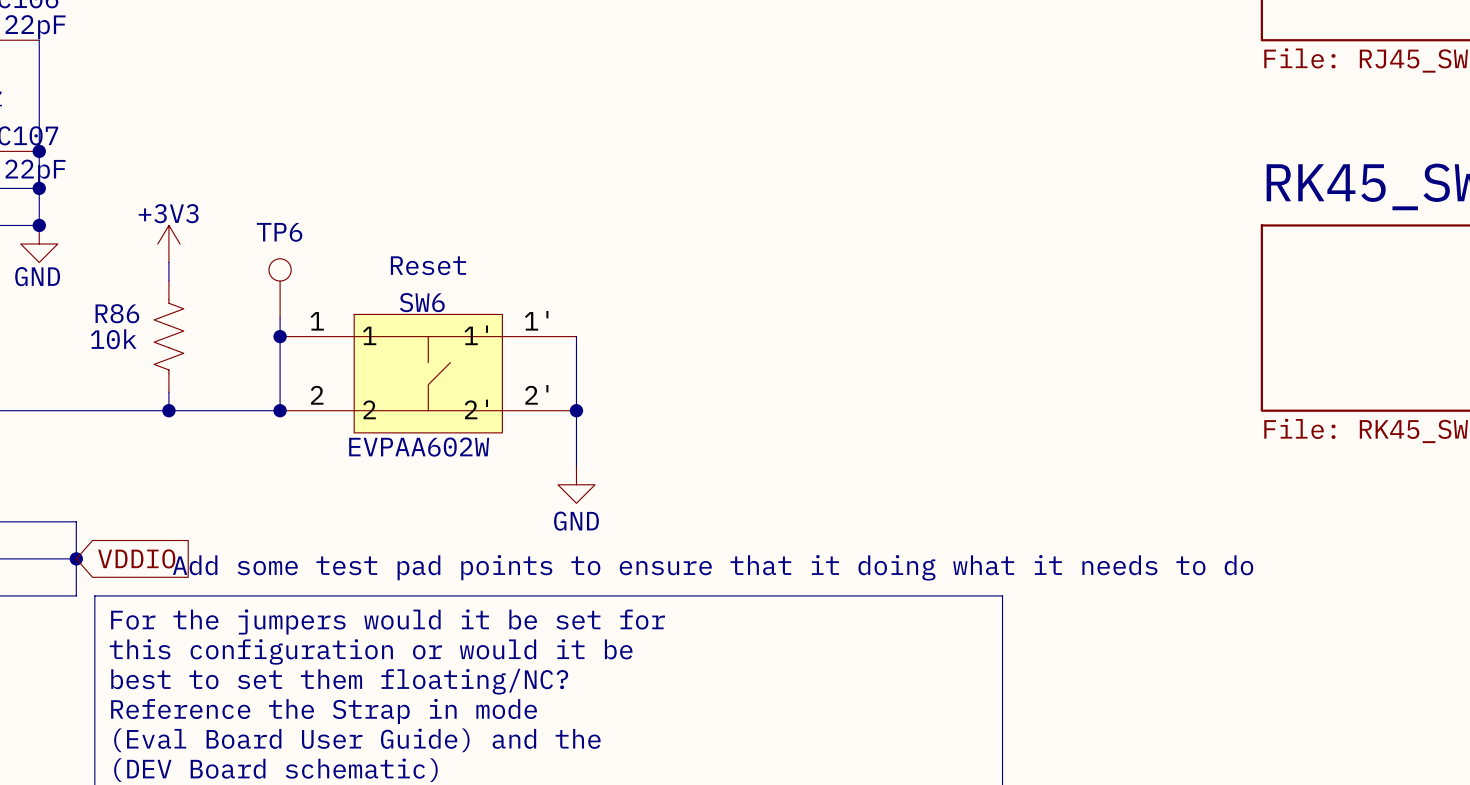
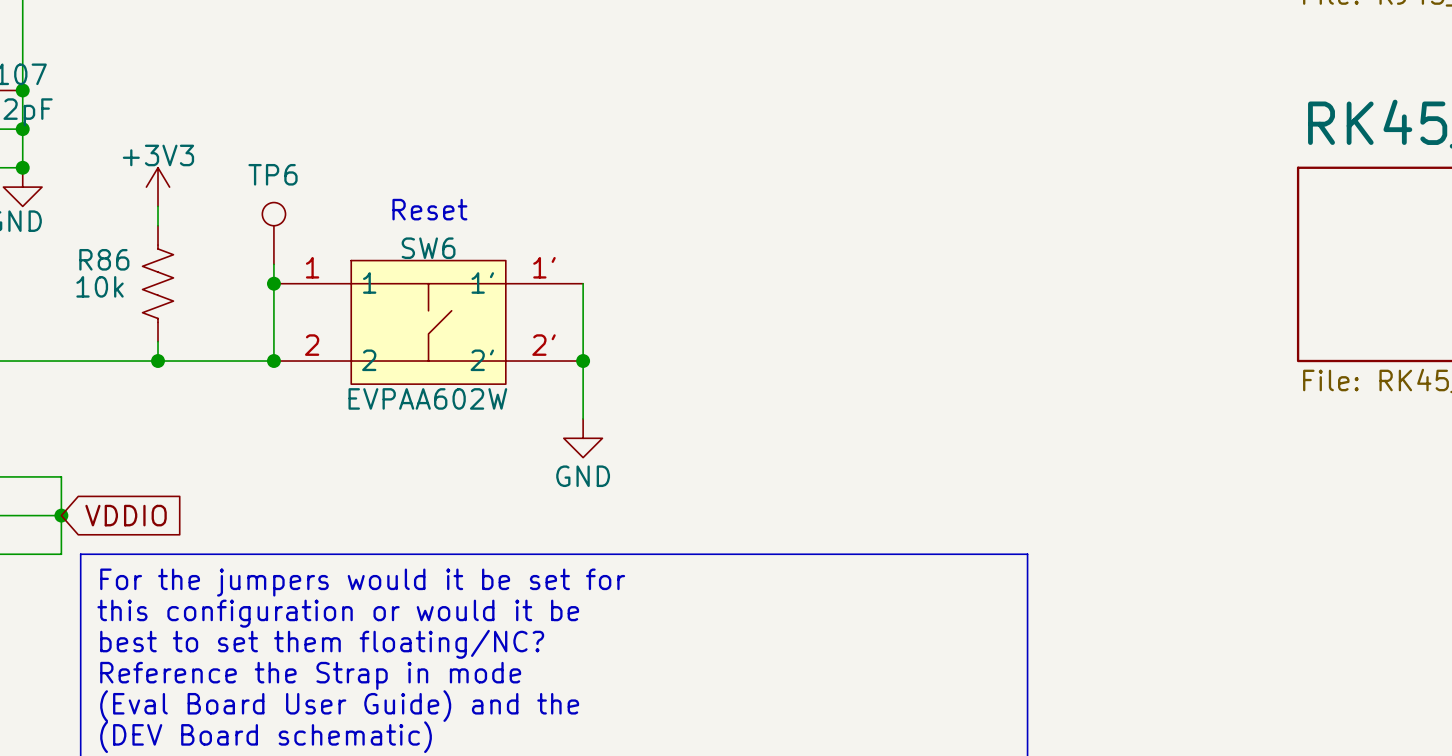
text: Add some test pad points to ensure that it doing what it needs to do (713, 567) -> none

